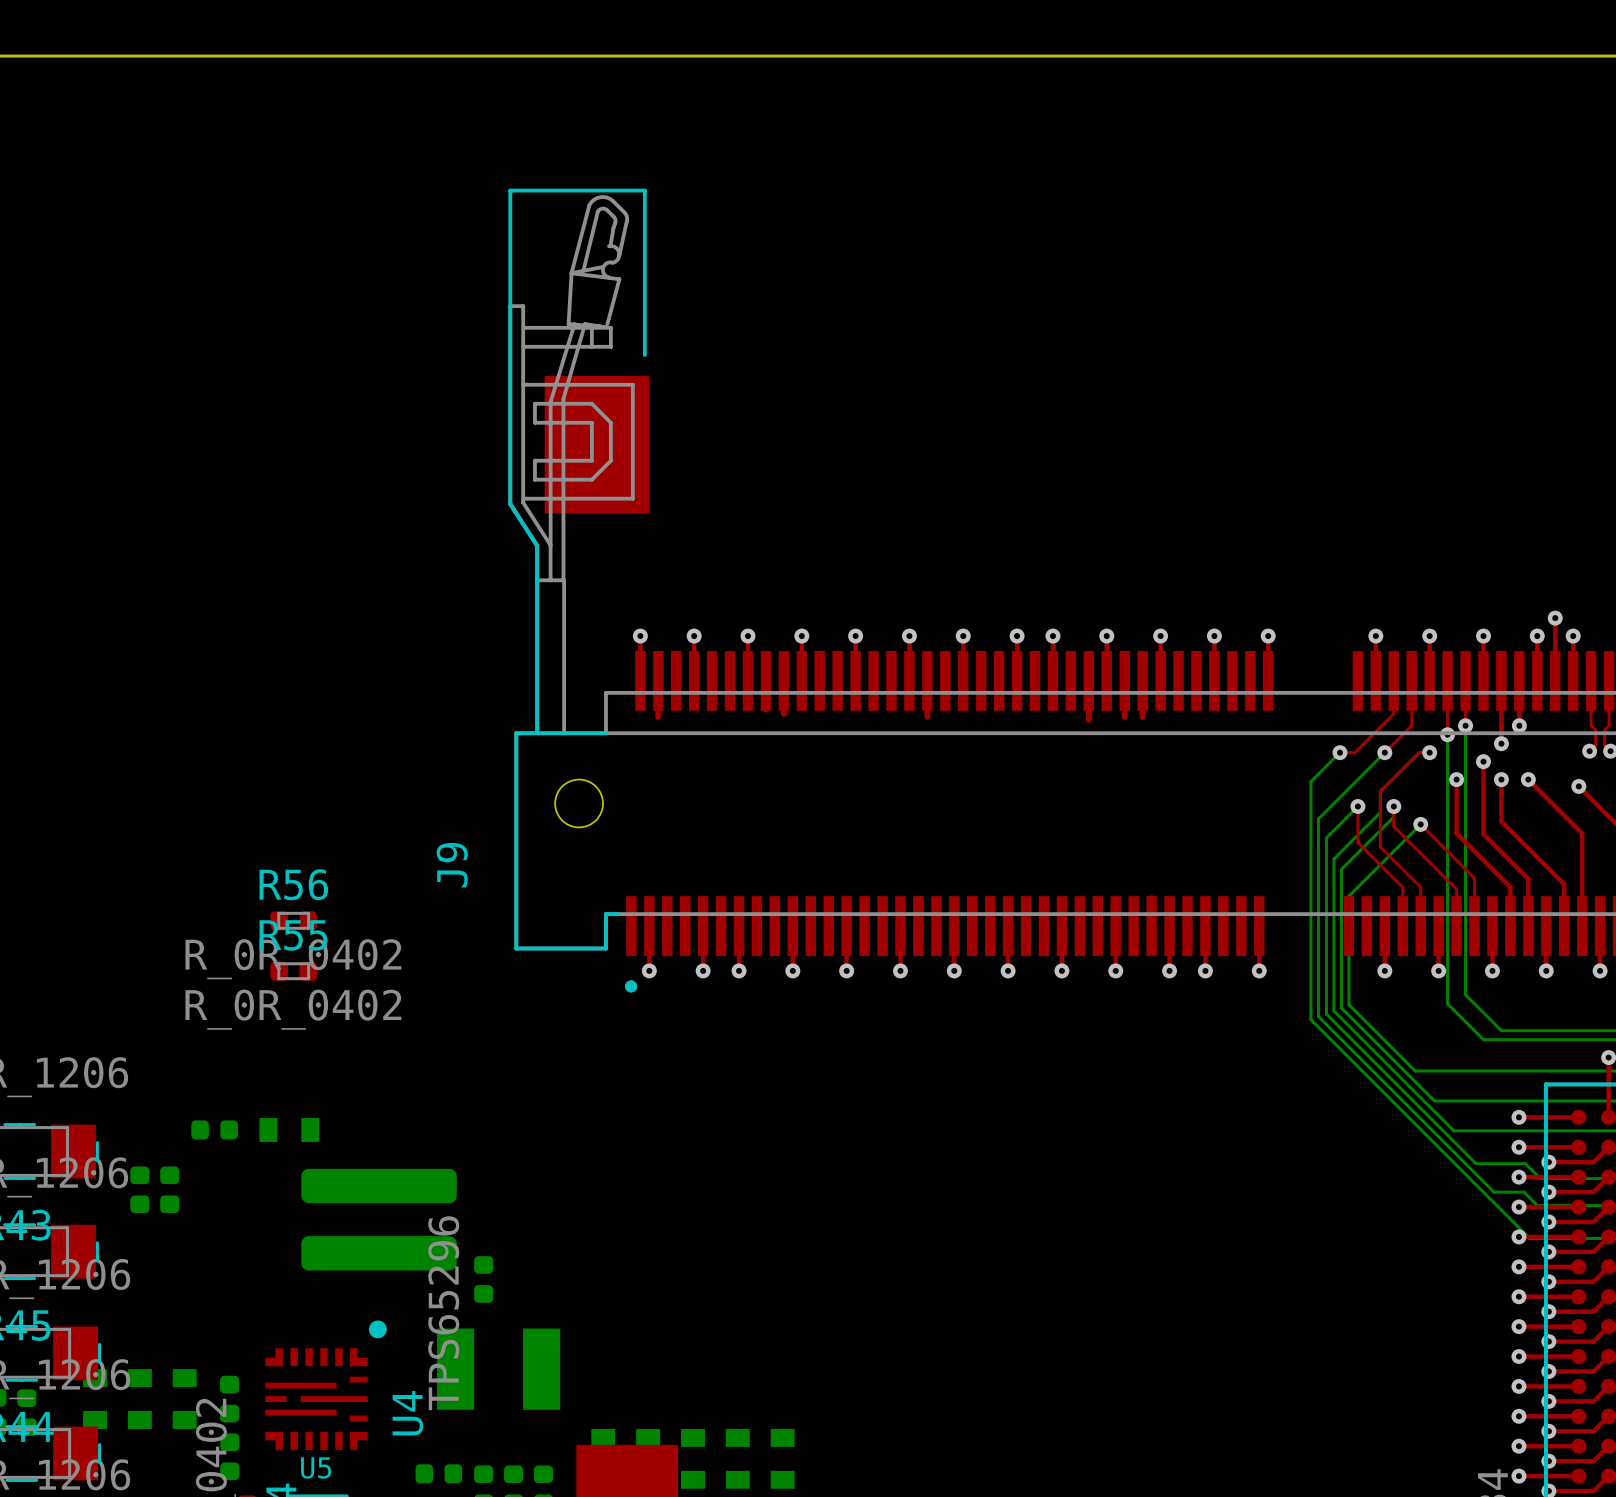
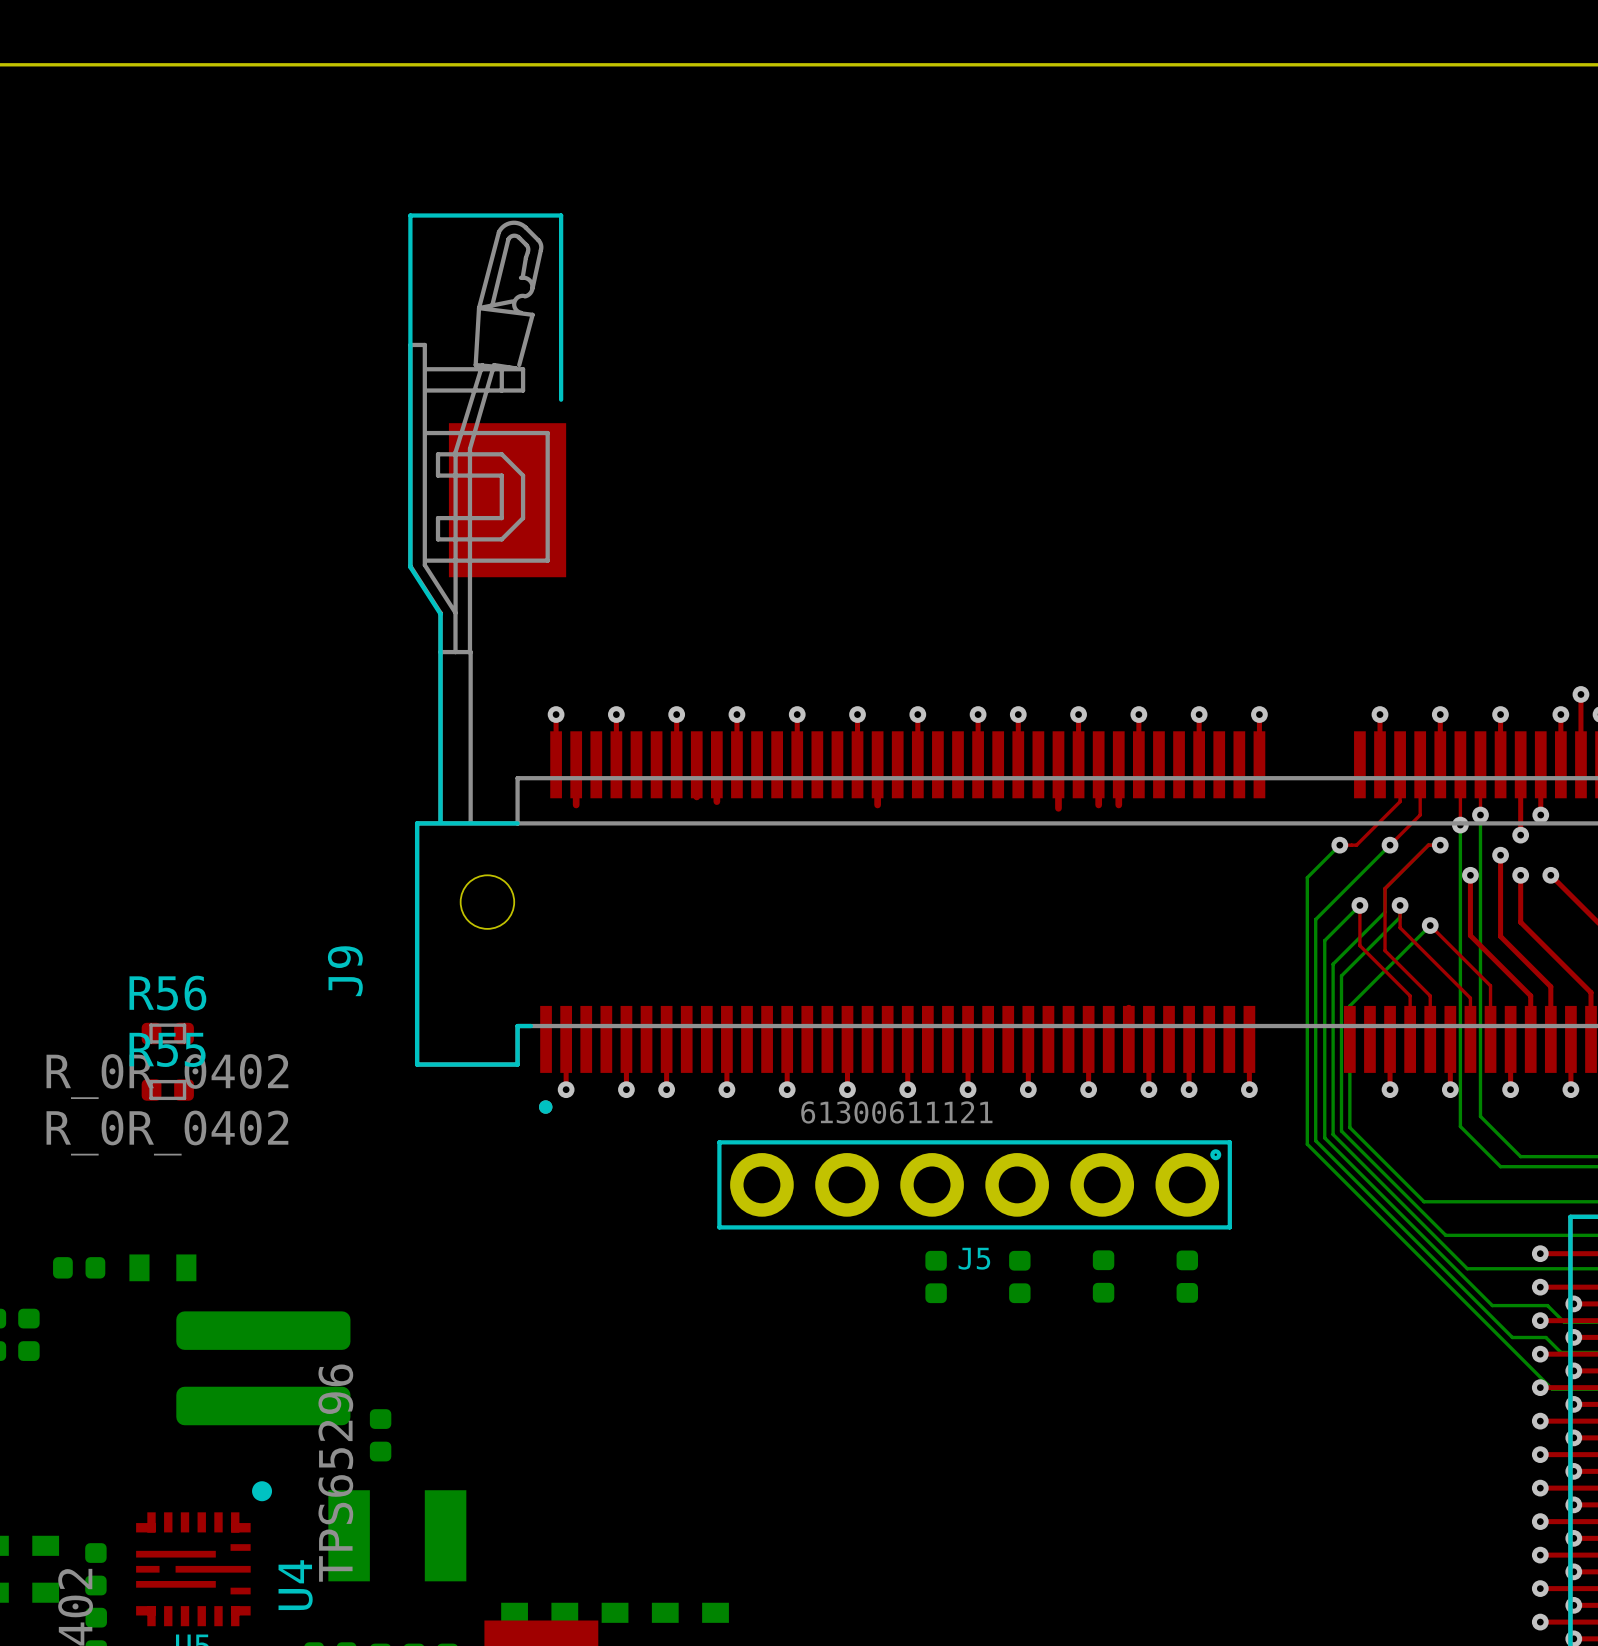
J5: none -> 61300611121 (974, 1184)
part: none -> (1103, 1276)
part: none -> (1187, 1276)
part: none -> (936, 1276)
part: none -> (1019, 1276)

